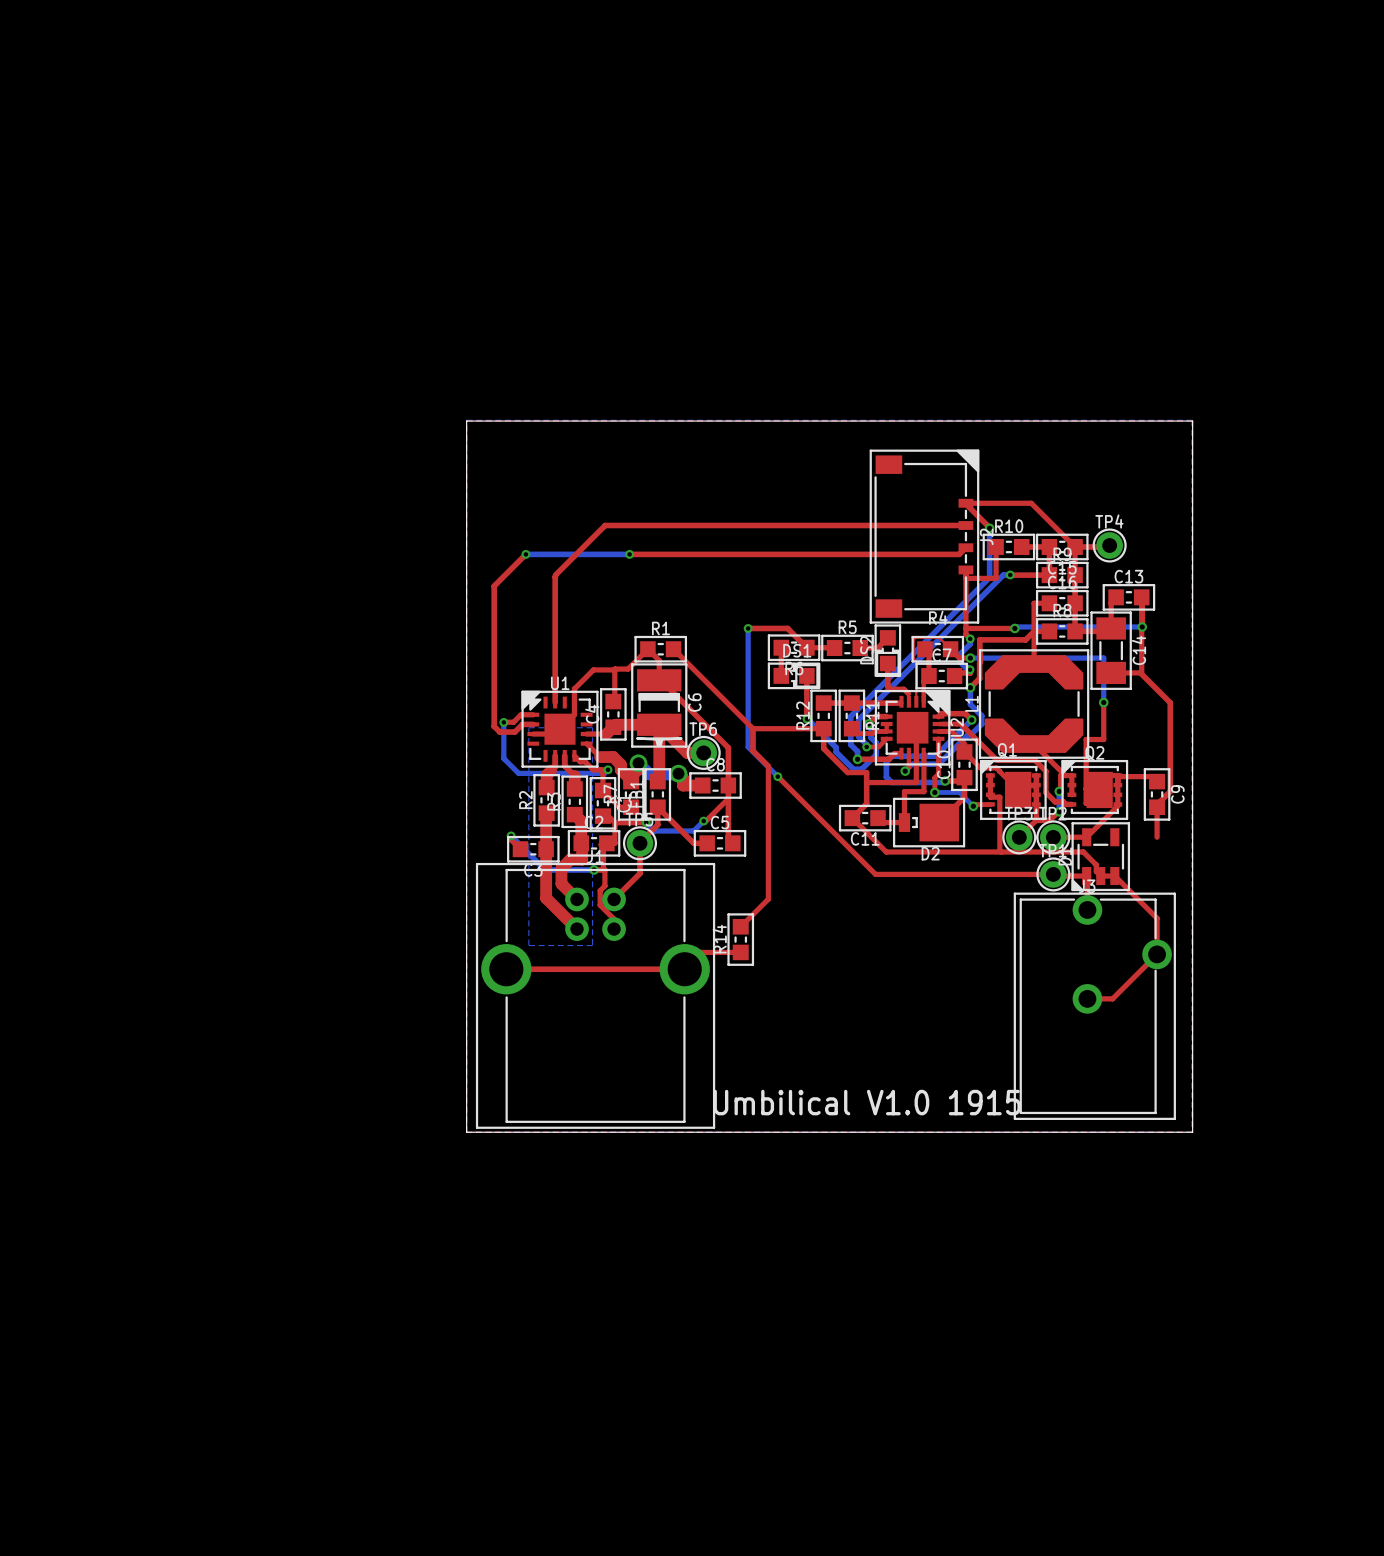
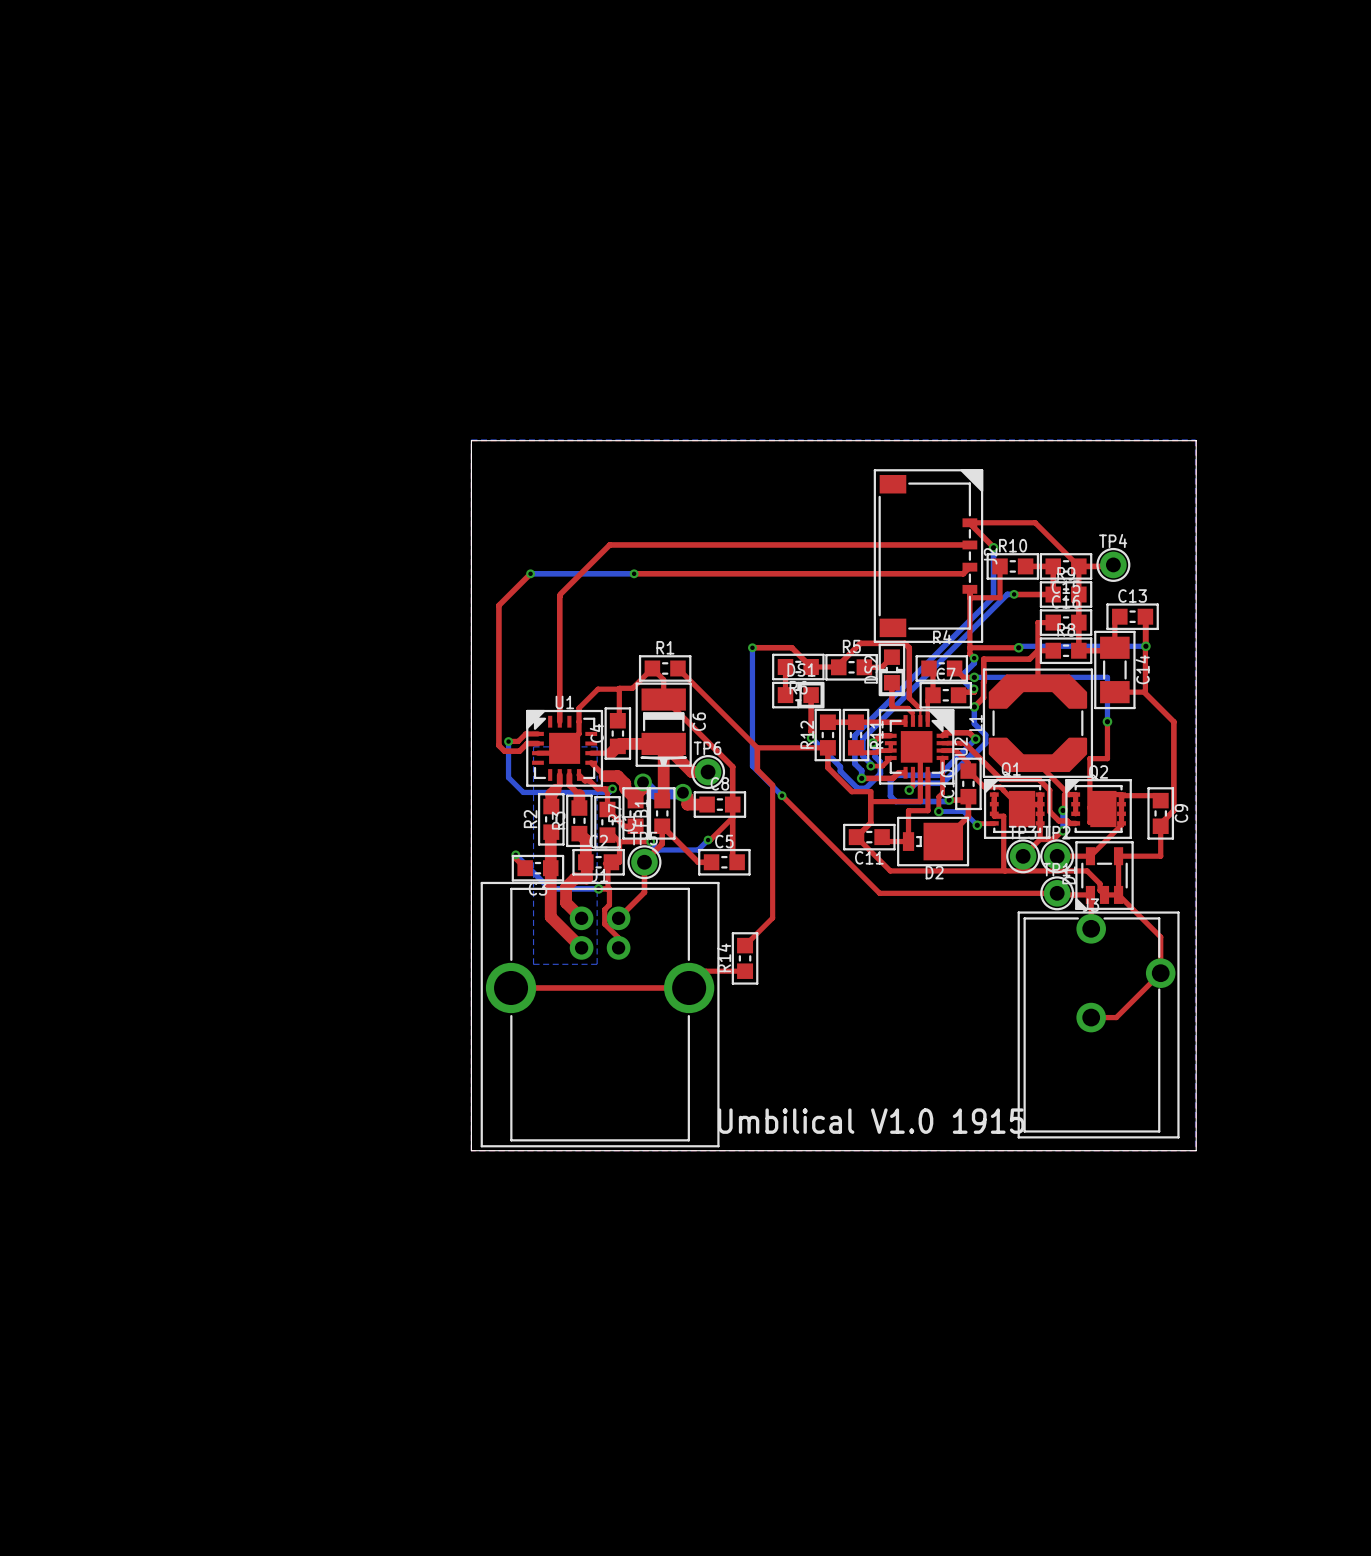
top track: (950, 649) (939, 637) (915, 637) (913, 639) (913, 658) (916, 661) (916, 689) -> (836, 667) (860, 643) (904, 643) (909, 647) (909, 698) (920, 709)
top track: none -> (1160, 856) (1118, 856) (1118, 894)

